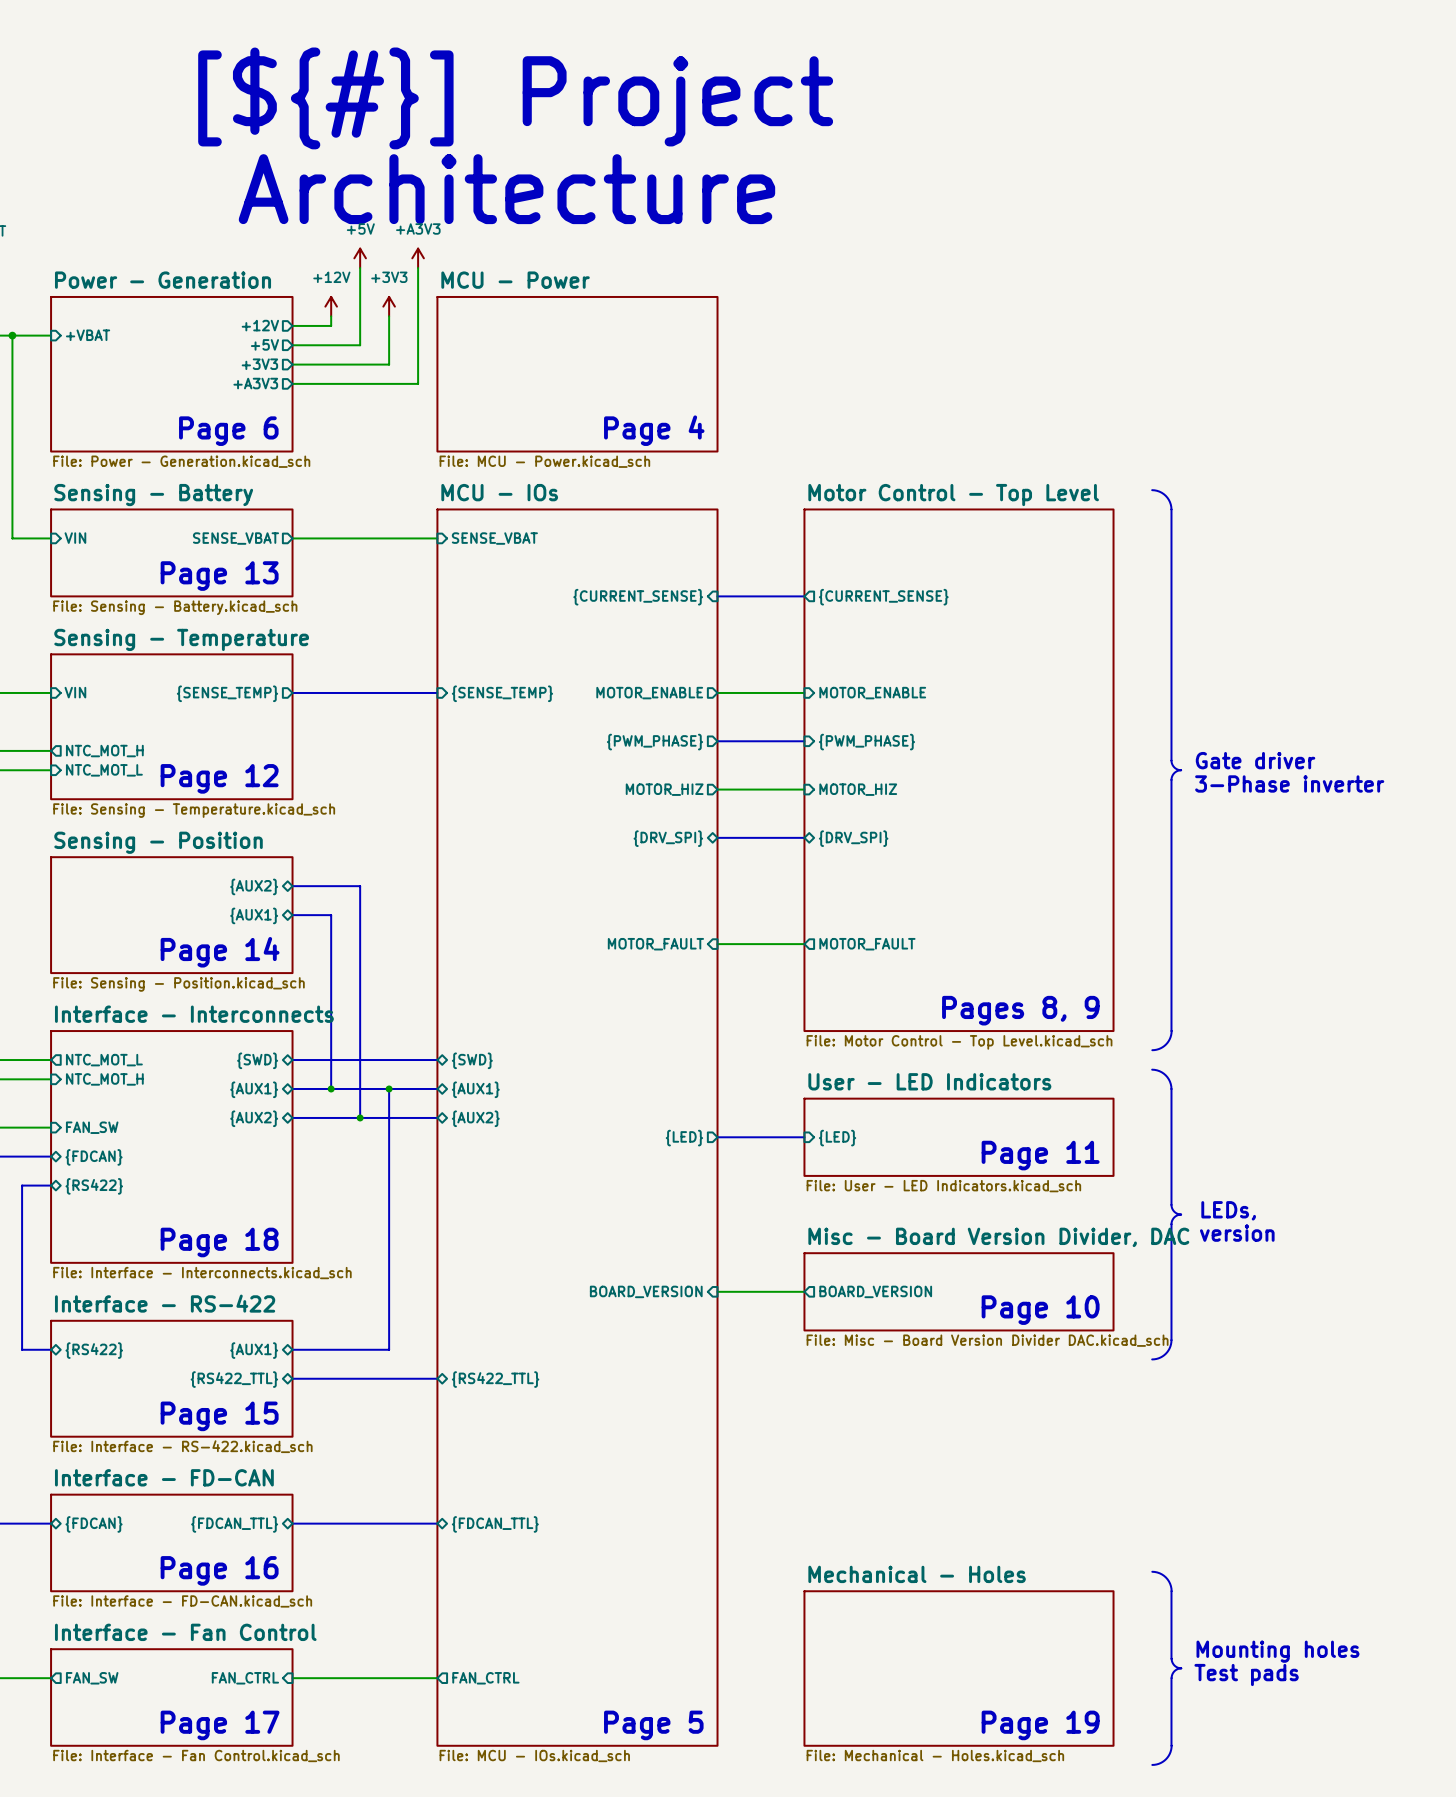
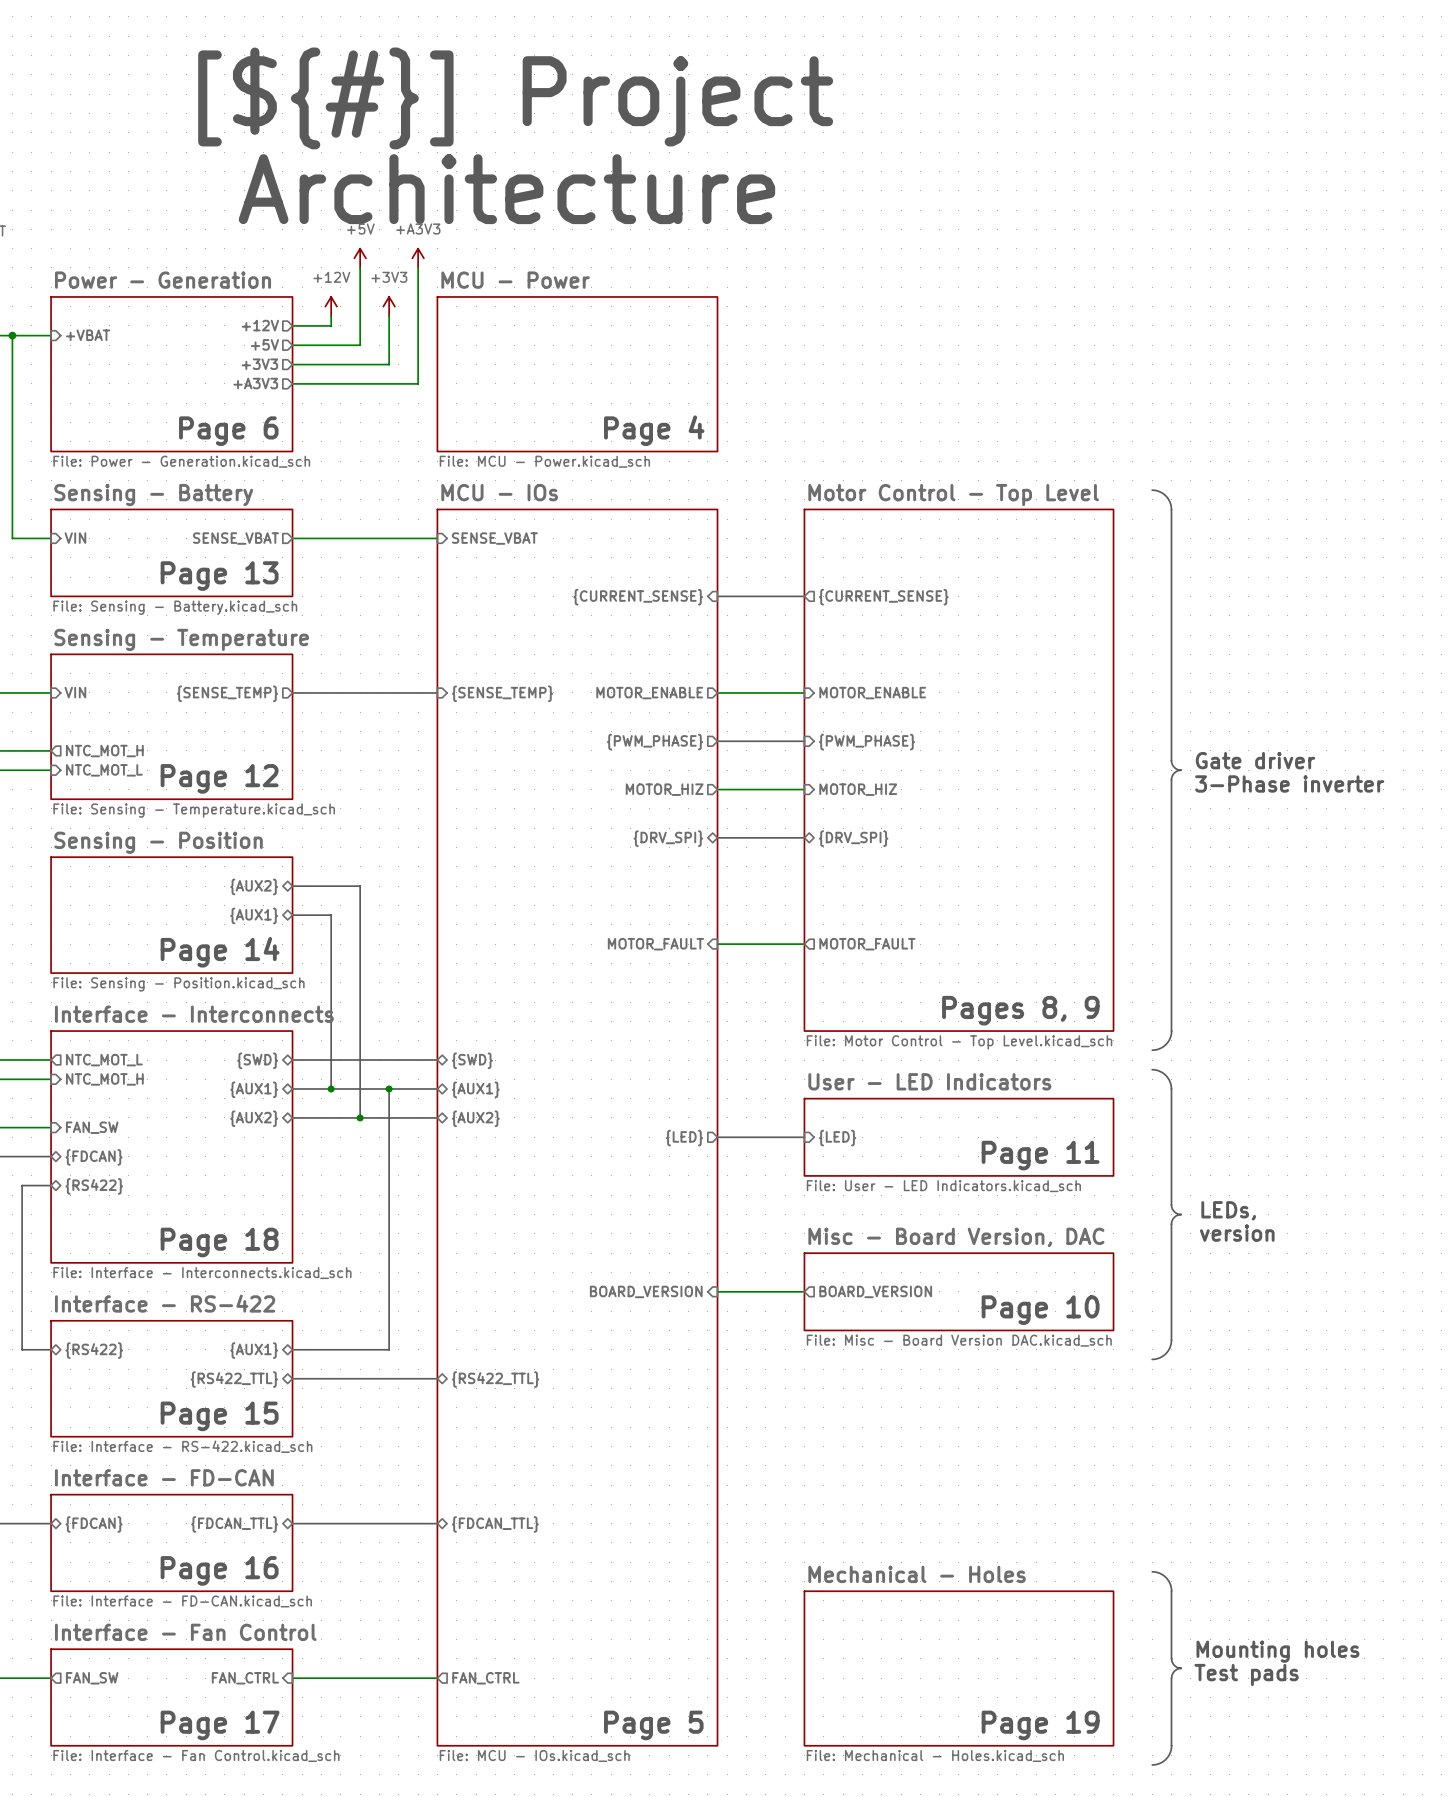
sheet Misc - Board Version, DAC name: Misc - Board Version Divider, DAC (998, 1237) -> Misc - Board Version, DAC (956, 1237)
sheet Misc - Board Version, DAC value: File: Misc - Board Version Divider DAC.kicad_sch (987, 1340) -> File: Misc - Board Version DAC.kicad_sch (959, 1340)

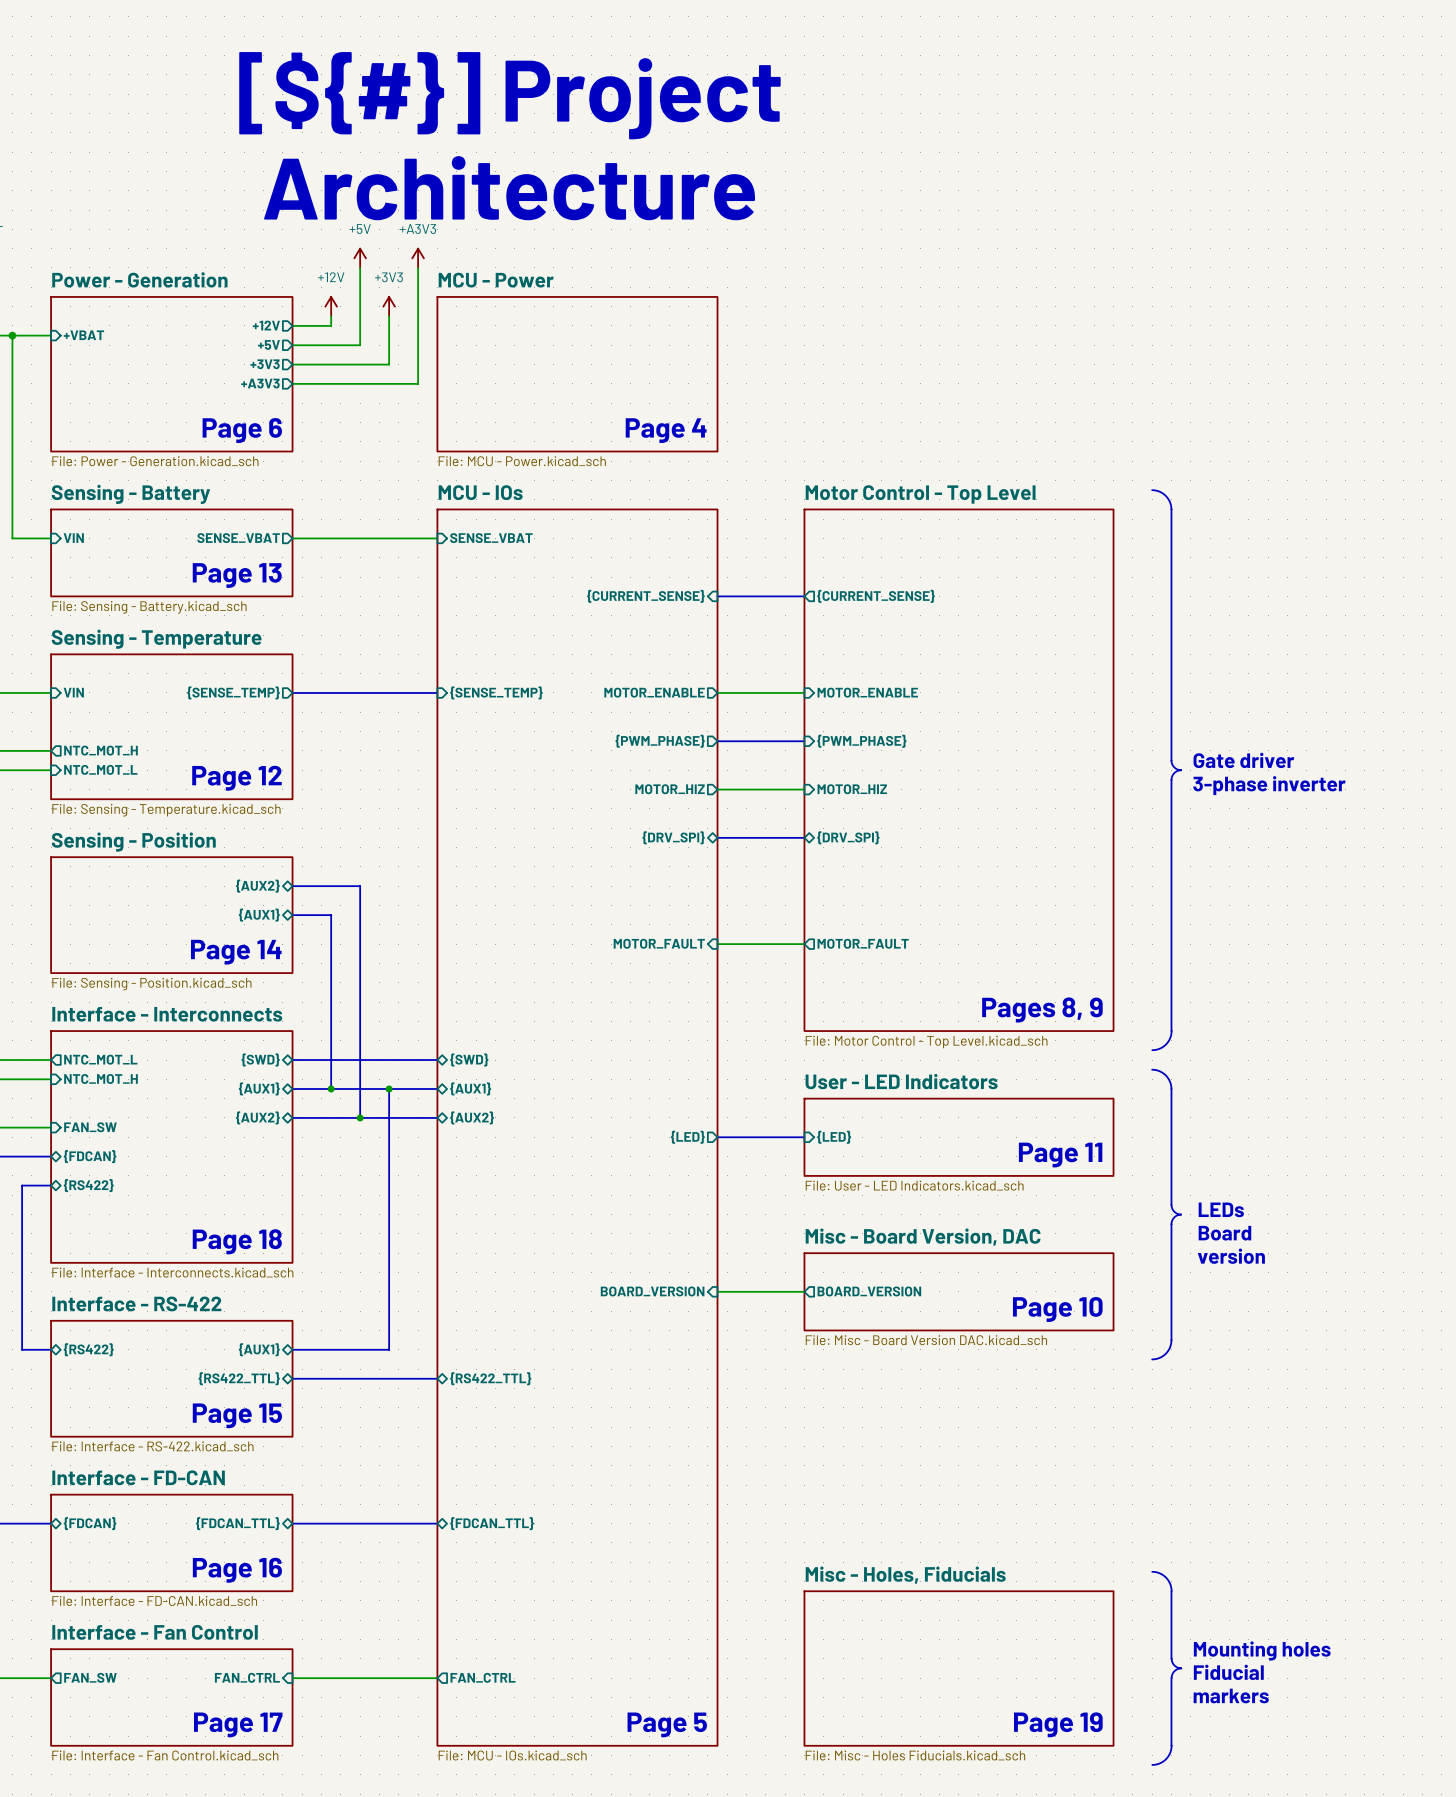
text: 3-Phase inverter (1289, 783) -> 3-phase inverter (1269, 785)
text: LEDs, (1228, 1210) -> LEDs (1221, 1209)
text: version (1237, 1233) -> Board (1224, 1233)
text: none -> version (1231, 1256)
sheet Mechanical - Holes name: Mechanical - Holes (917, 1574) -> Misc - Holes, Fiducials (905, 1575)
text: Test pads (1246, 1675) -> Fiducial (1228, 1672)
text: none -> markers (1231, 1695)
sheet Mechanical - Holes value: File: Mechanical - Holes.kicad_sch (935, 1755) -> File: Misc - Holes Fiducials.kicad_sch (915, 1755)

